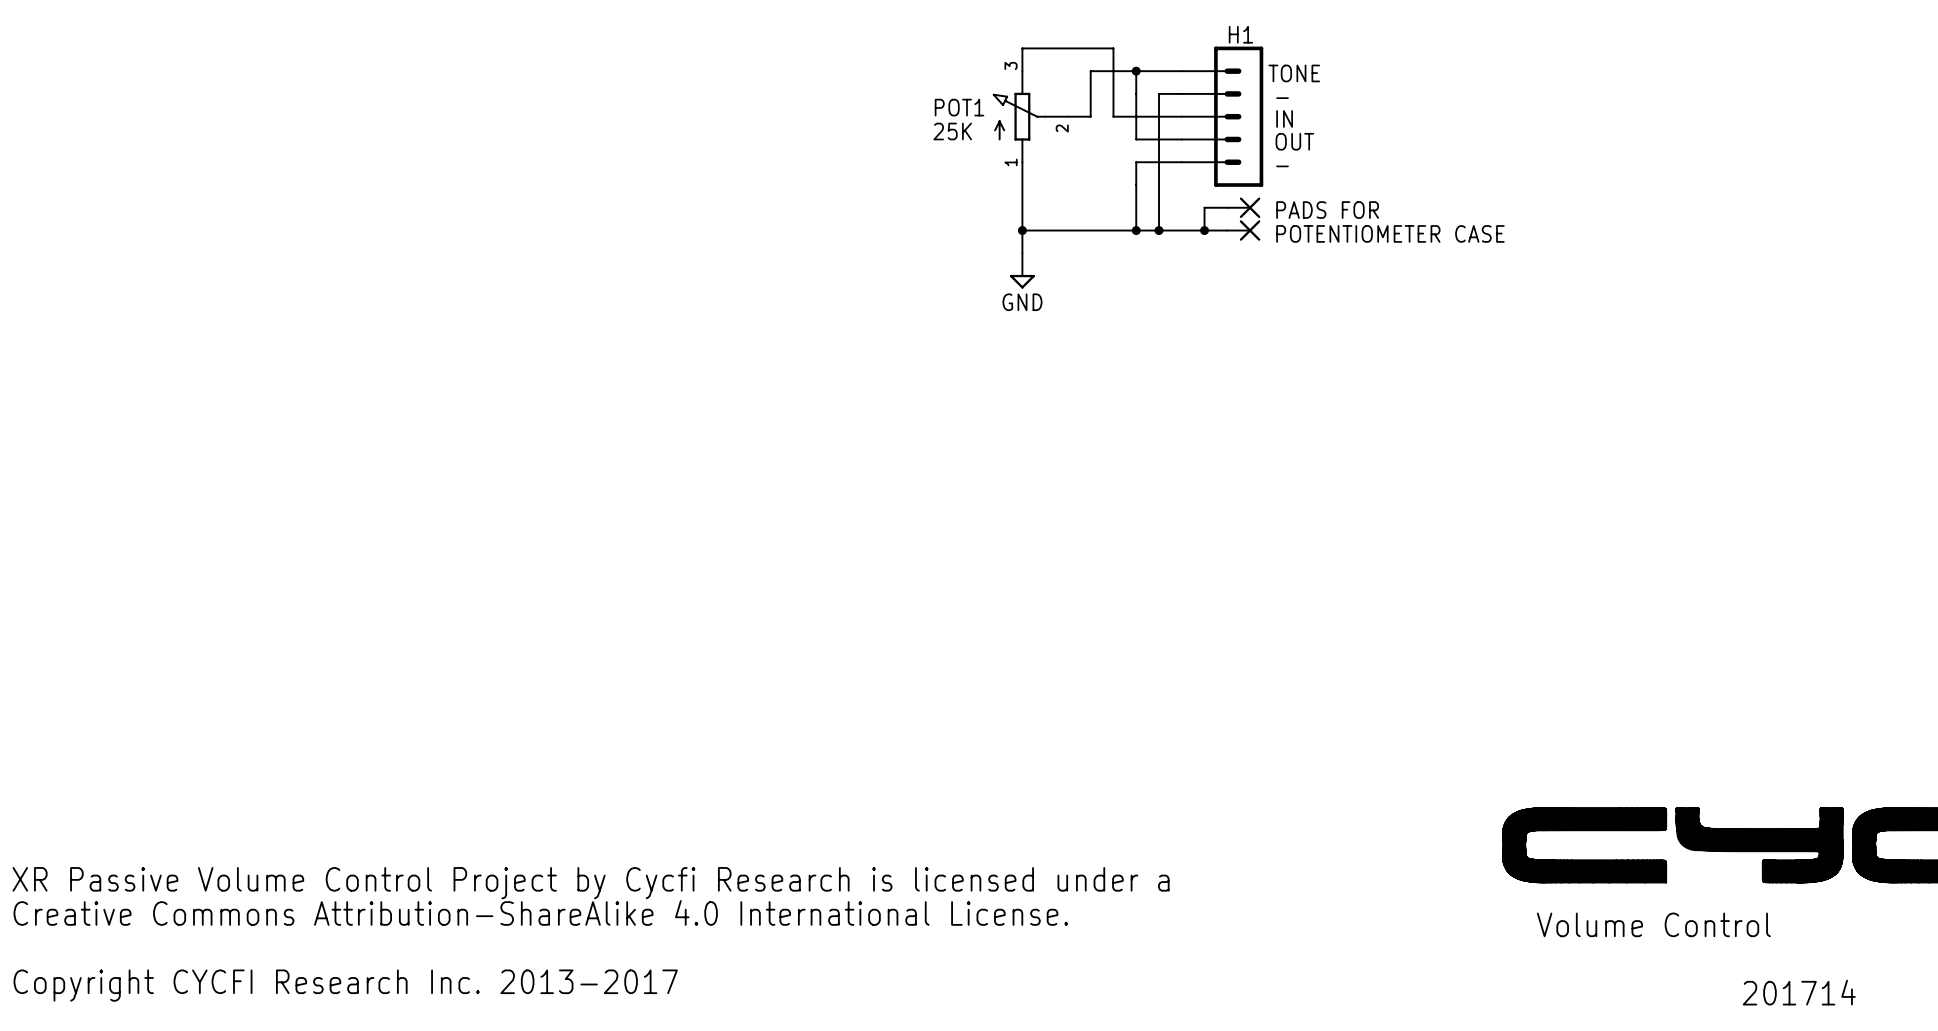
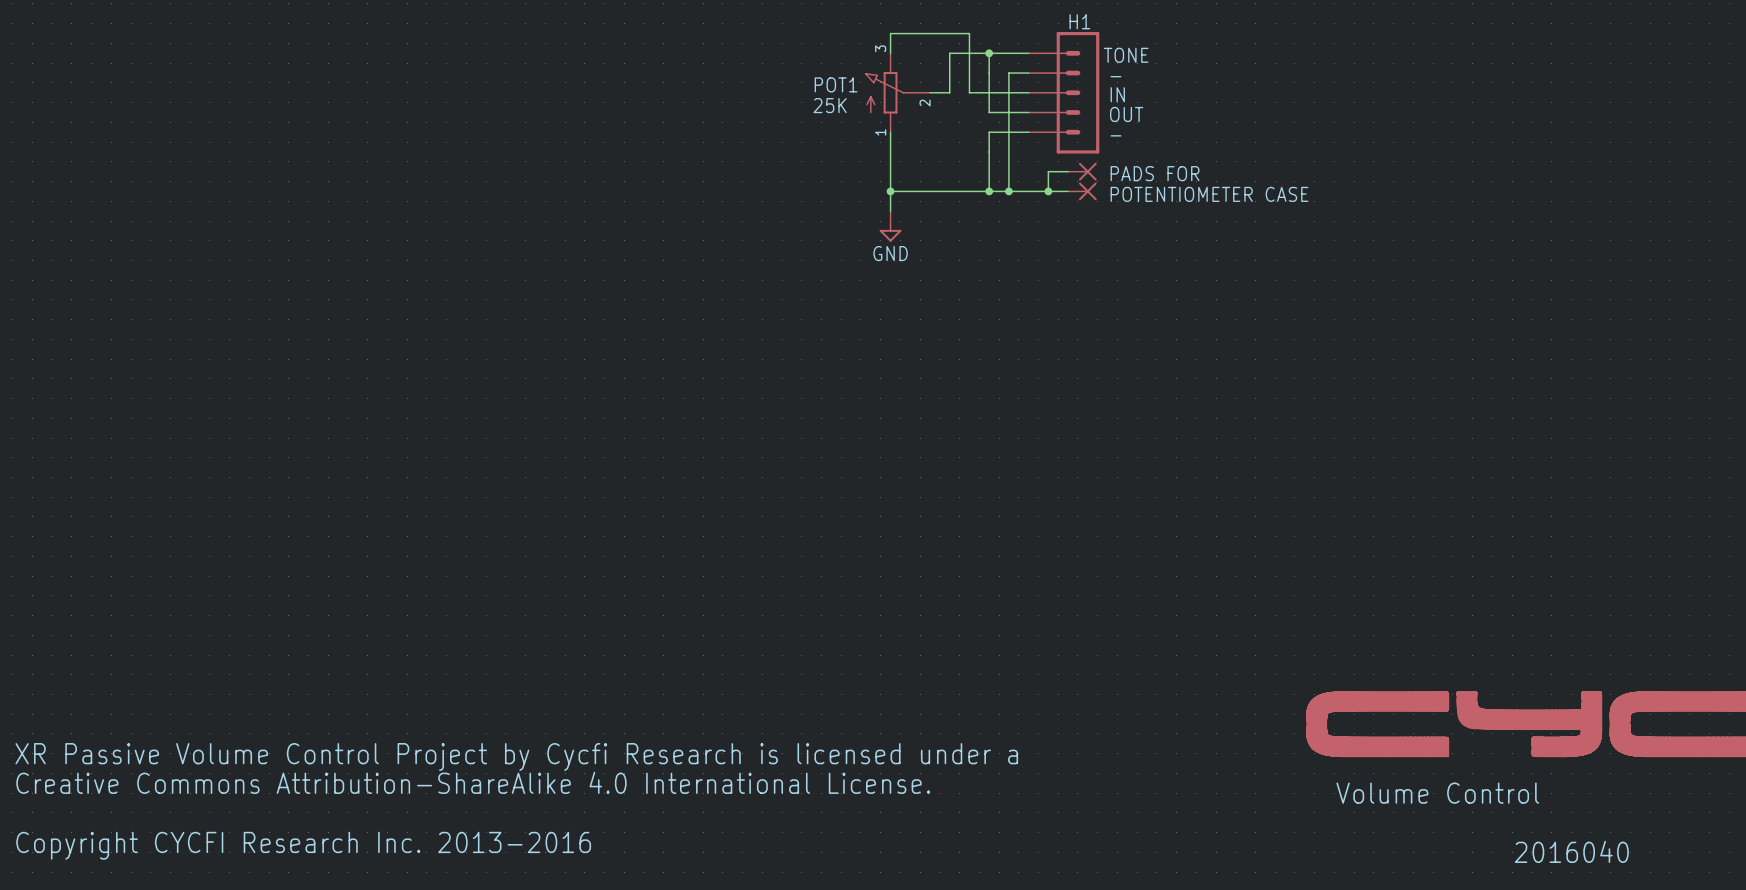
text: Copyright CYCFI Research Inc. 2013-2017 (345, 985) -> Copyright CYCFI Research Inc. 2013-2016 (303, 845)
text: 201714 (1799, 992) -> 2016040 (1571, 851)

